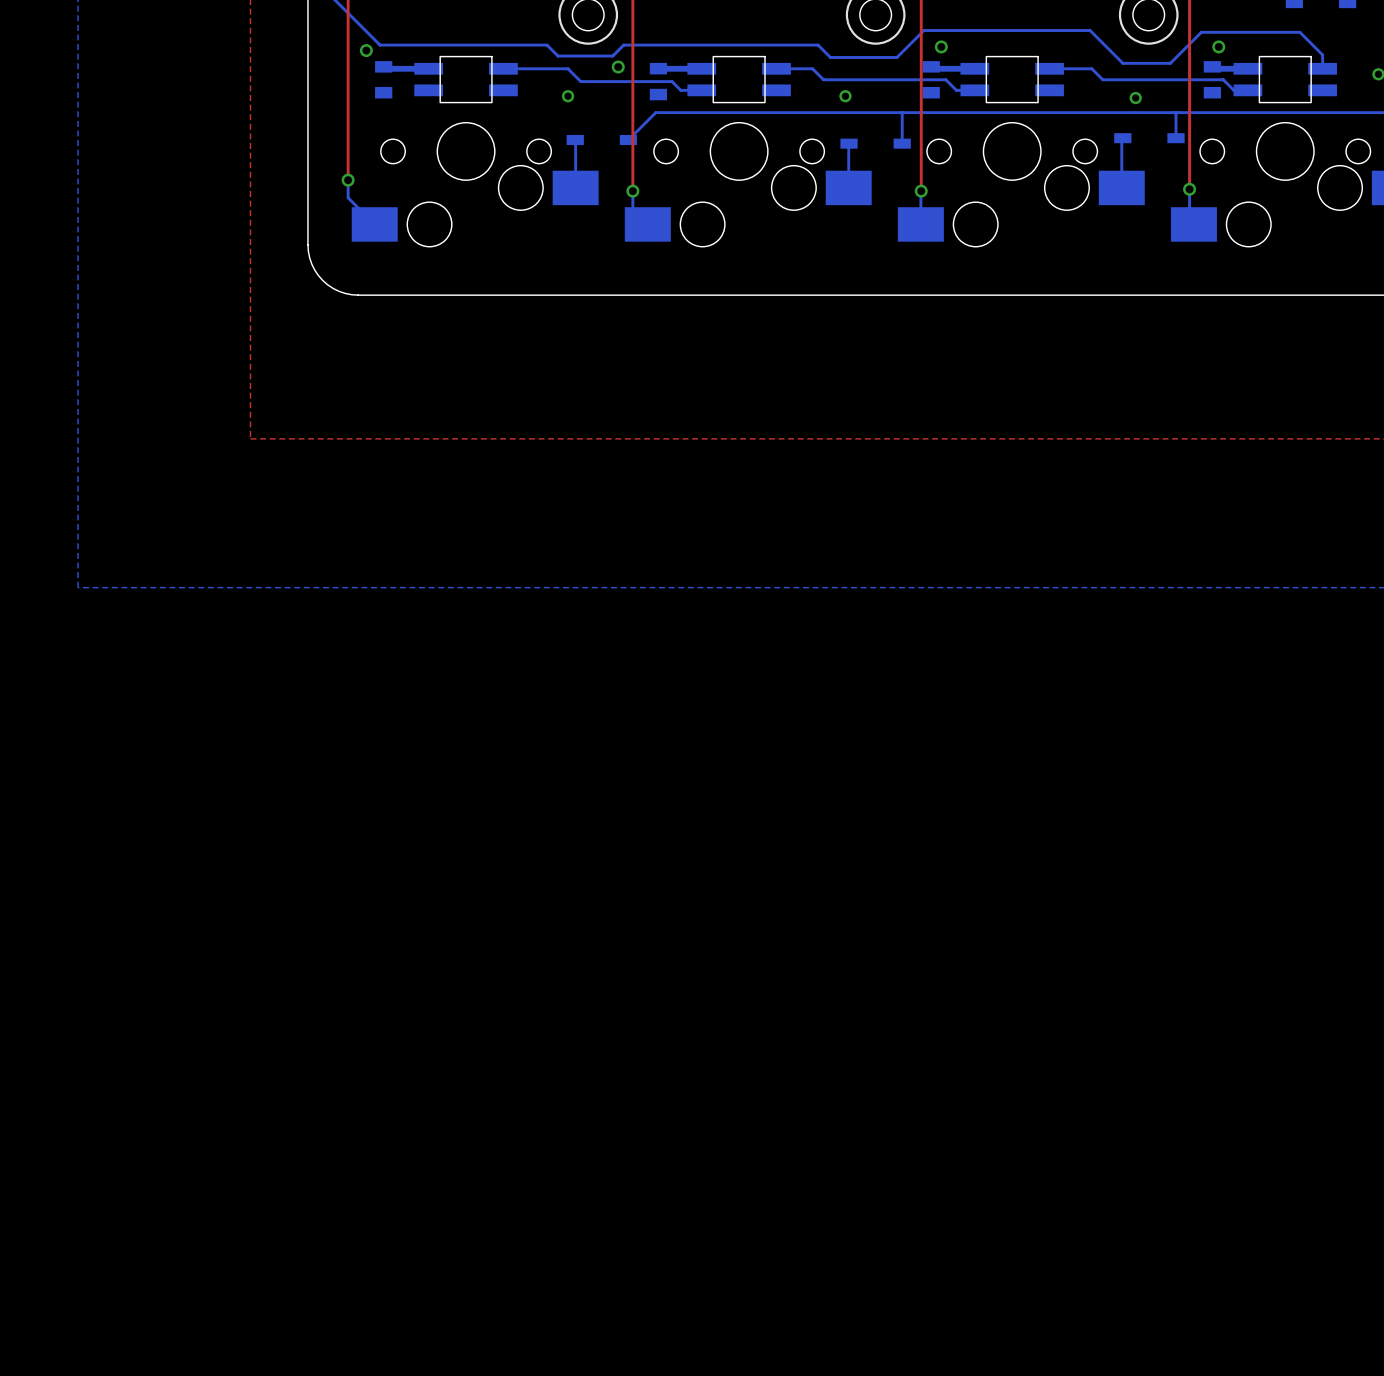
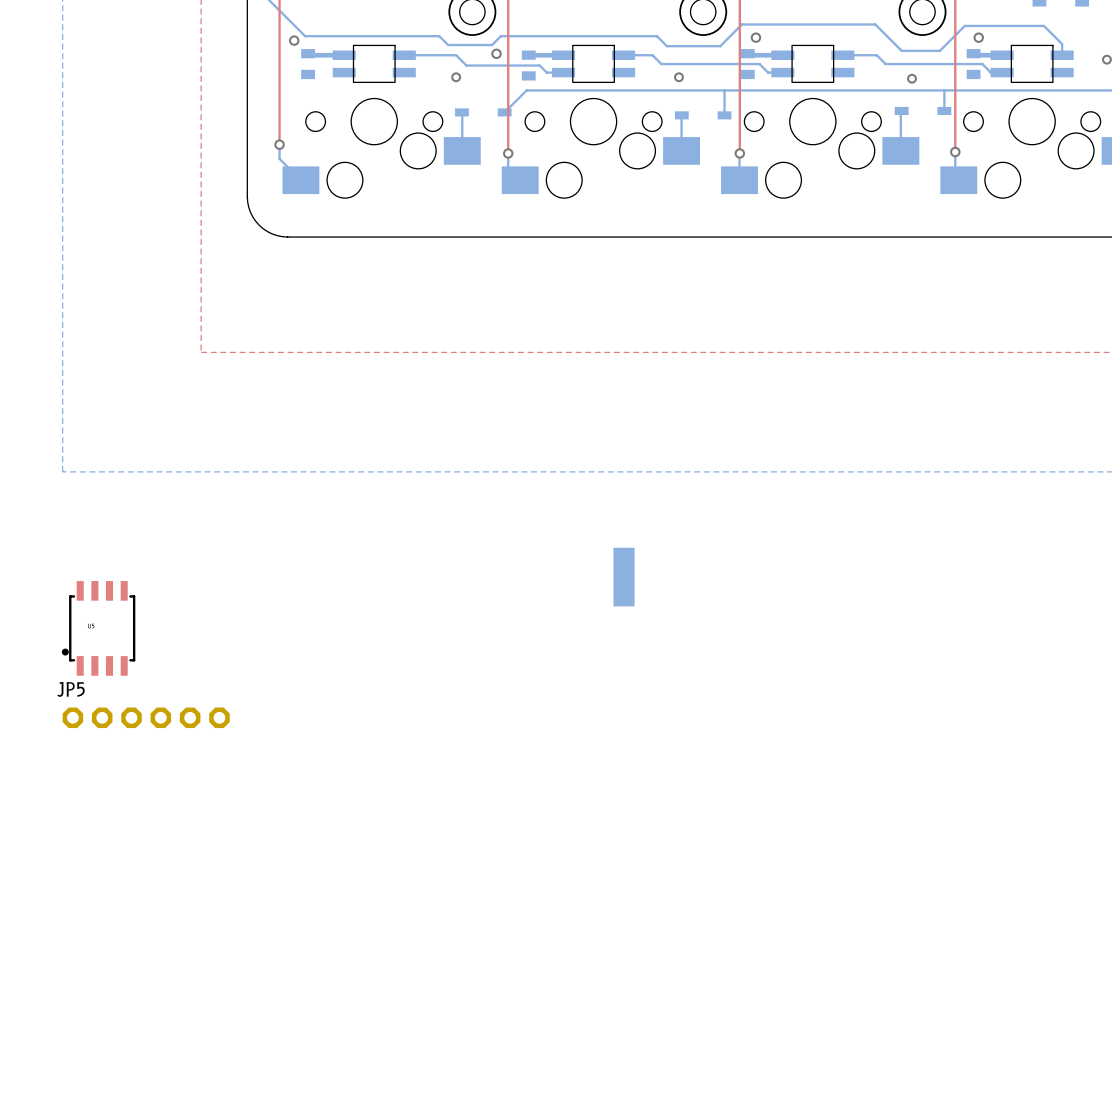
part: none -> (624, 577)
part: none -> (98, 628)
JP5: none -> (146, 717)

